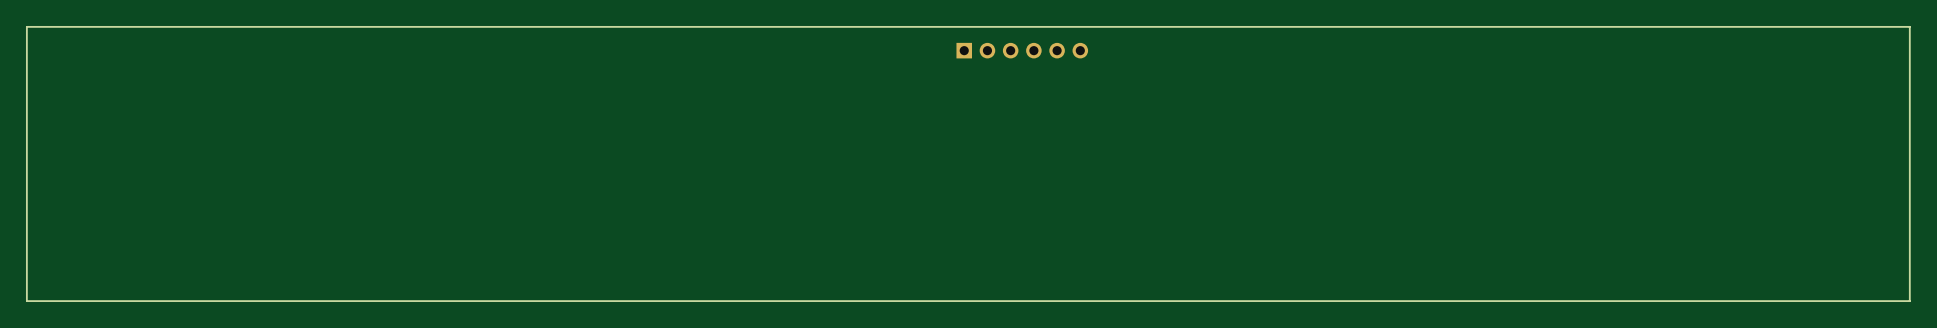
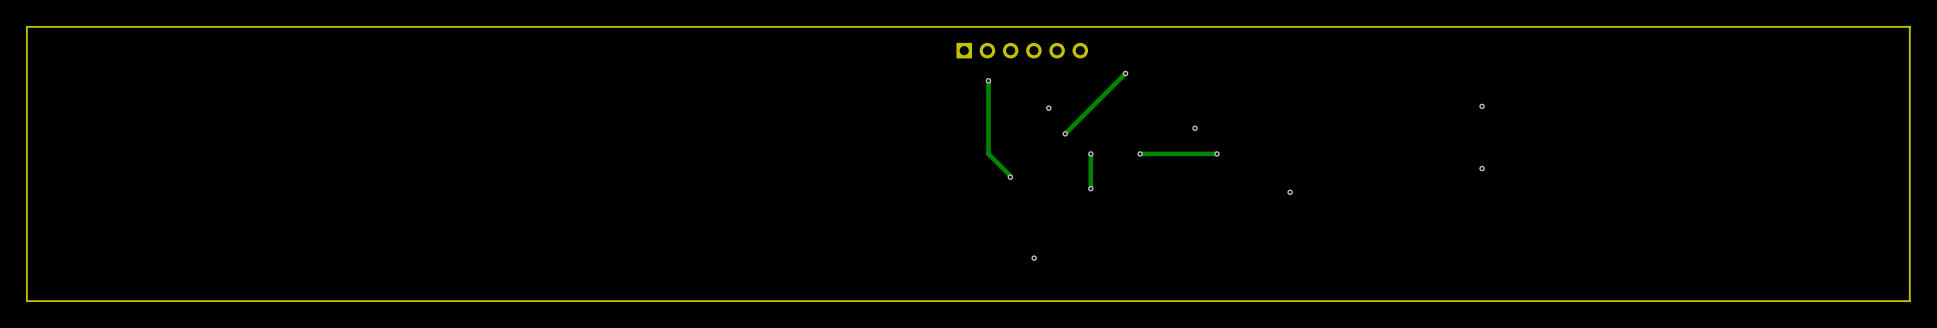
track: none -> (1125, 73) (1065, 133)
via: none -> (1125, 73)
track: none -> (988, 80) (988, 153) (1010, 175)
via: none -> (988, 80)
via: none -> (1482, 106)
via: none -> (1048, 108)
via: none -> (1195, 128)
via: none -> (1065, 133)
track: none -> (1090, 153) (1090, 188)
via: none -> (1090, 153)
via: none -> (1140, 153)
track: none -> (1216, 153) (1140, 153)
via: none -> (1216, 153)
via: none -> (1482, 168)
via: none -> (1010, 177)
via: none -> (1090, 188)
via: none -> (1290, 192)
via: none -> (1034, 258)

